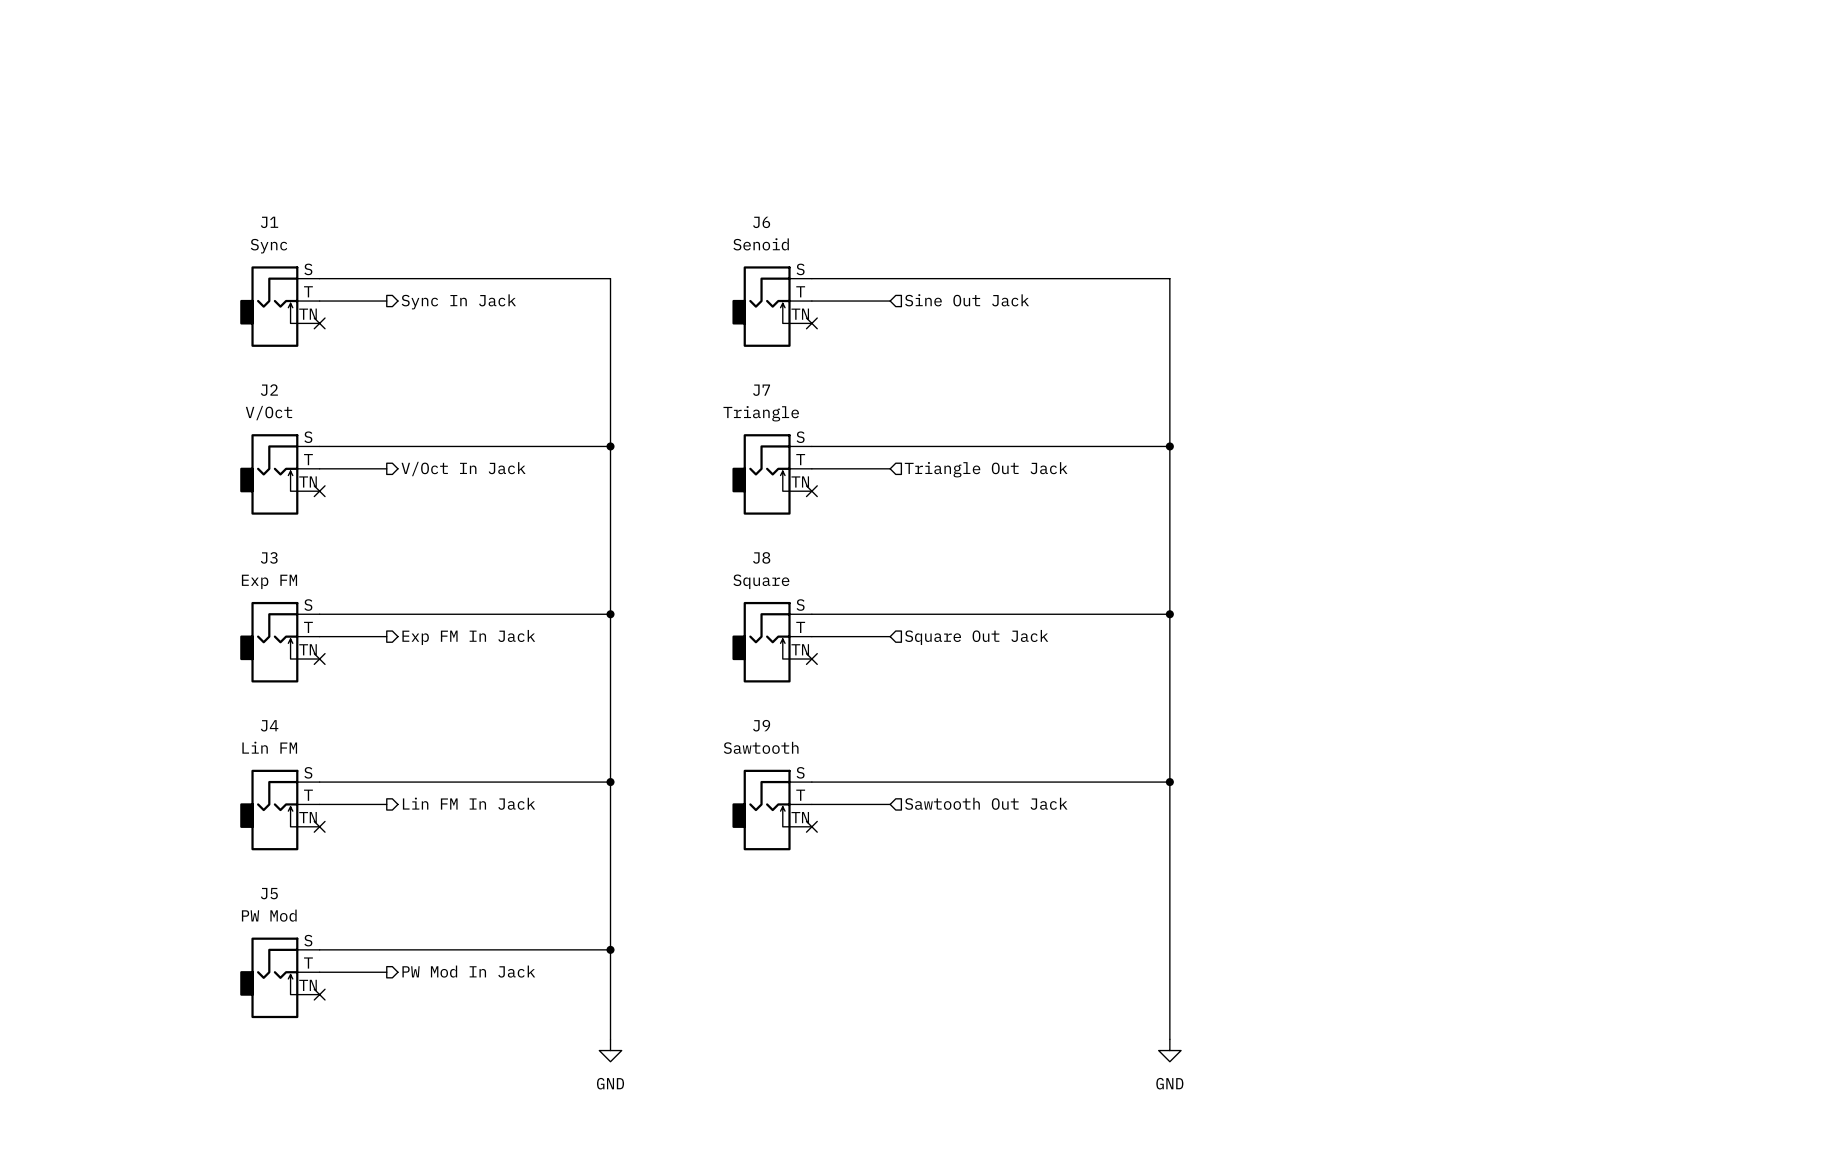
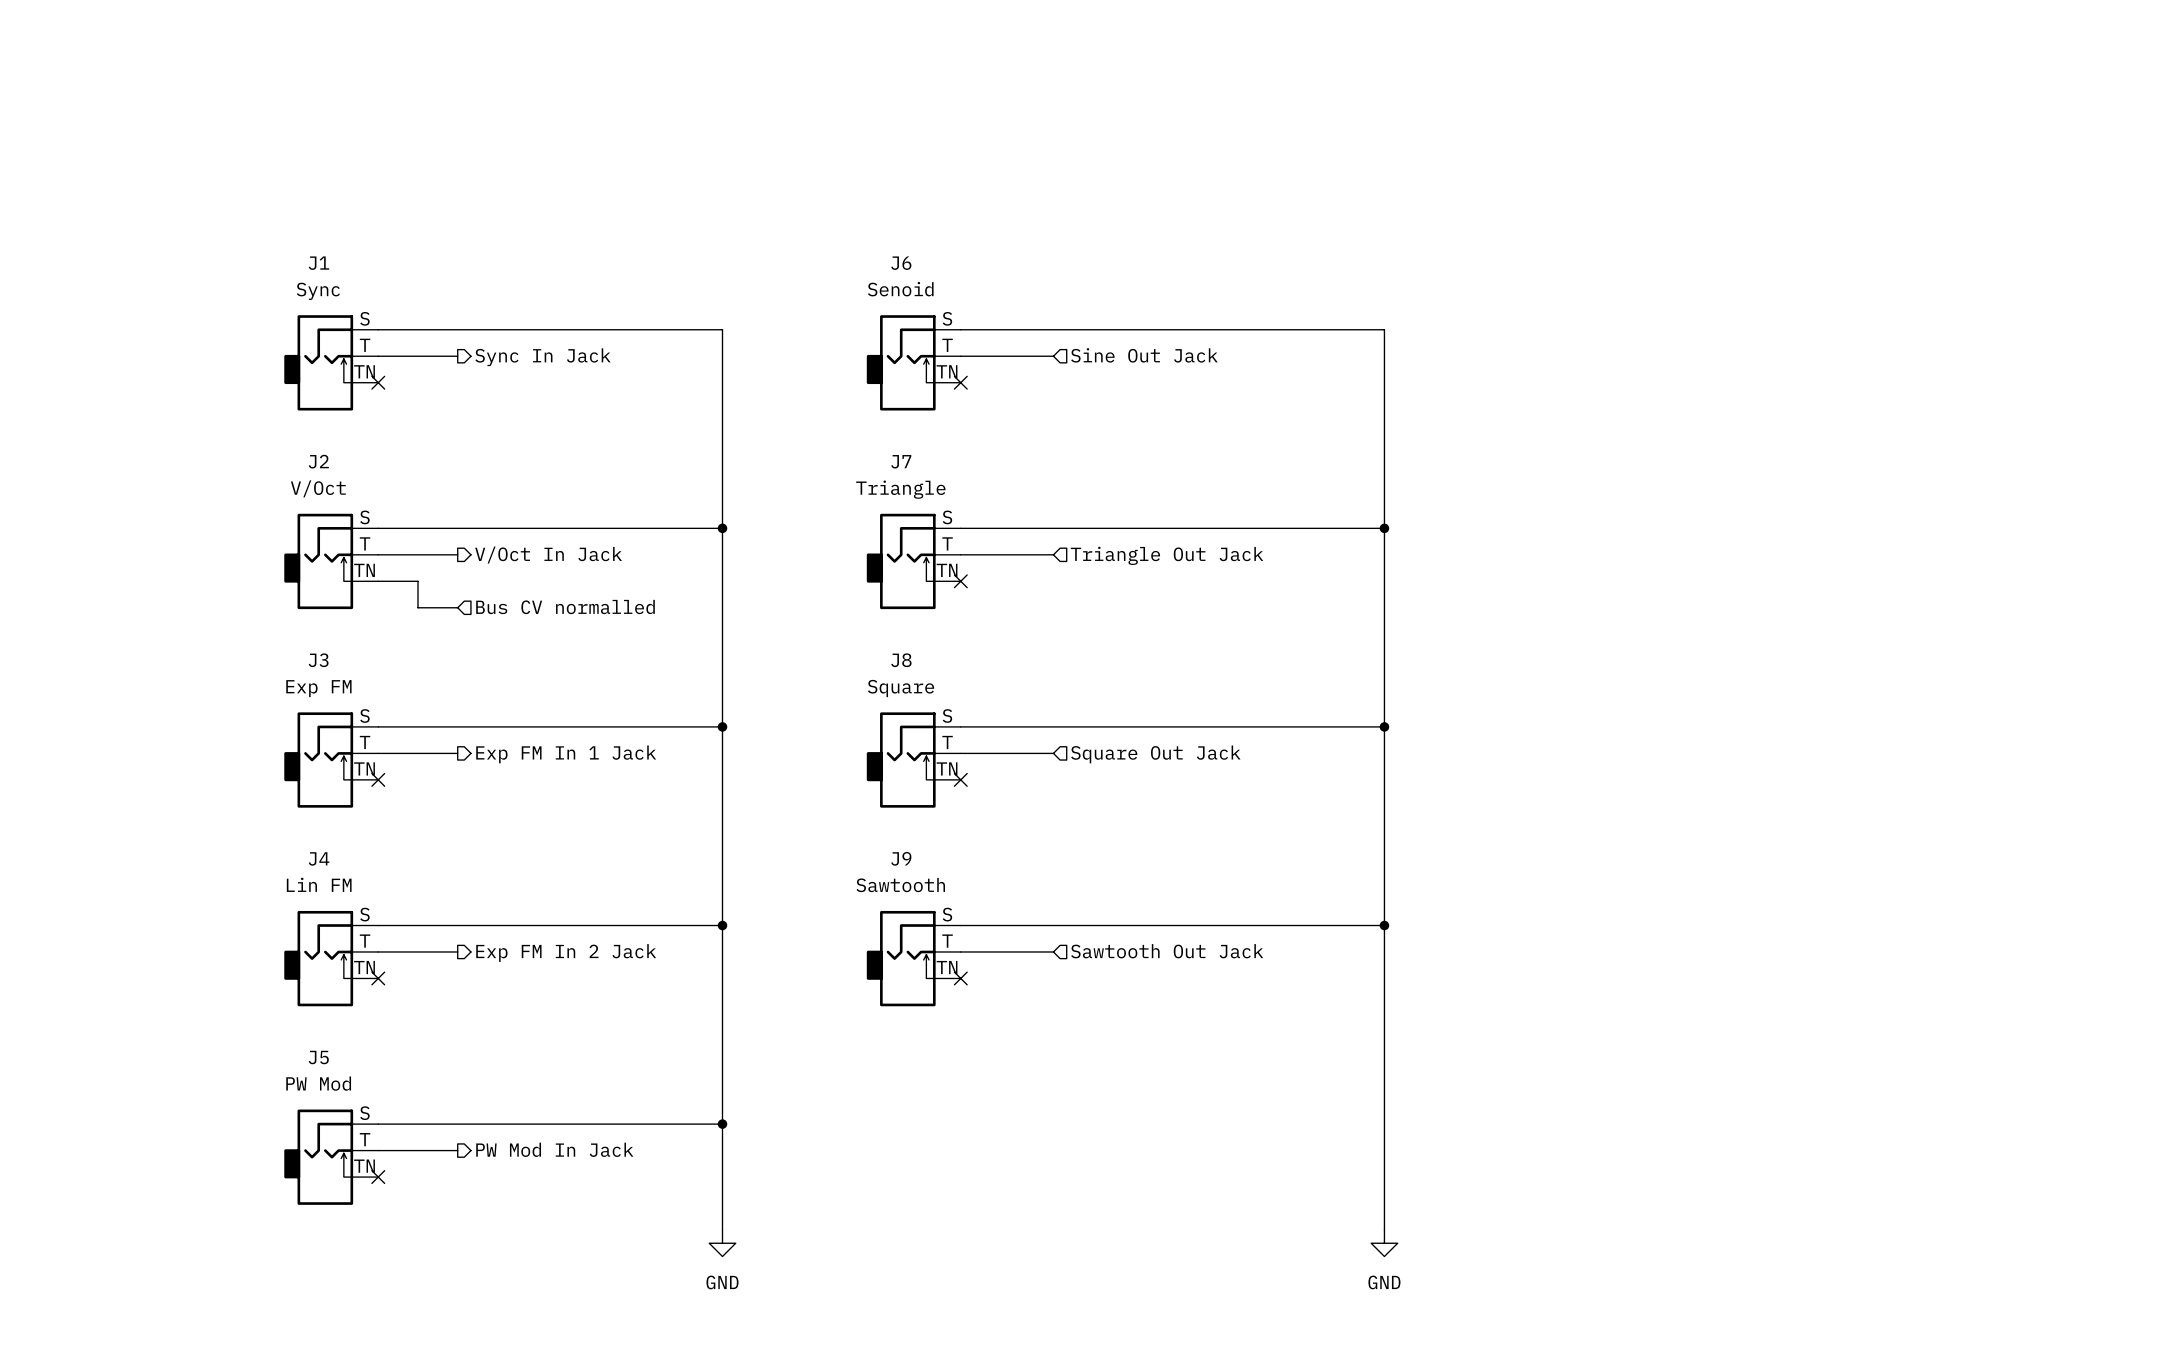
wire: none -> (378, 581) (418, 581) (418, 607) (457, 607)
no-connect mark: (319, 491) -> none
hierarchical label: none -> Bus CV normalled (565, 607)
hierarchical label: Exp FM In Jack (468, 637) -> Exp FM In 1 Jack (566, 754)
hierarchical label: Lin FM In Jack (469, 803) -> Exp FM In 2 Jack (566, 952)

